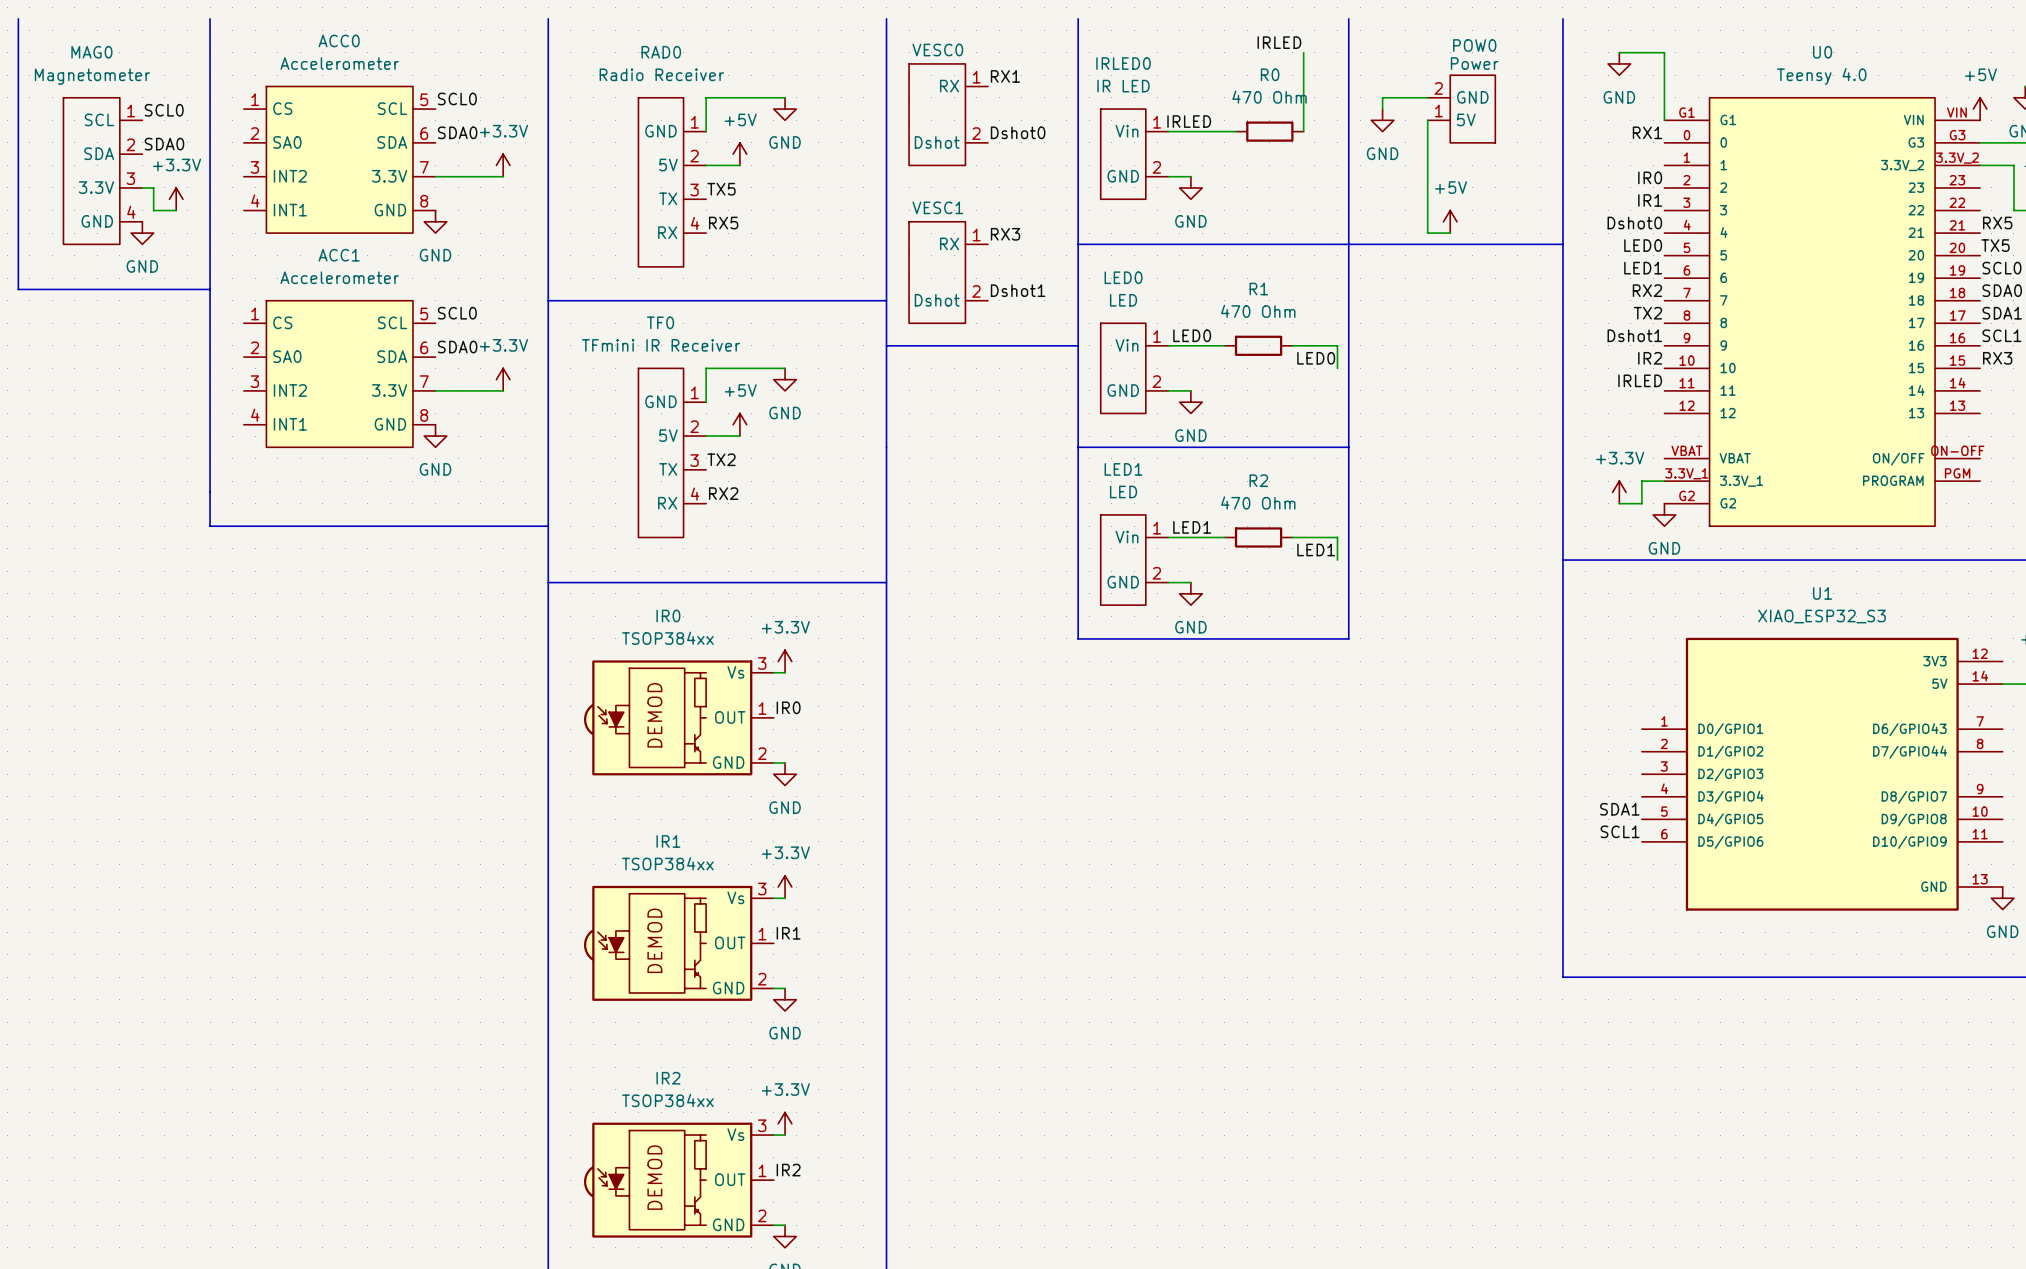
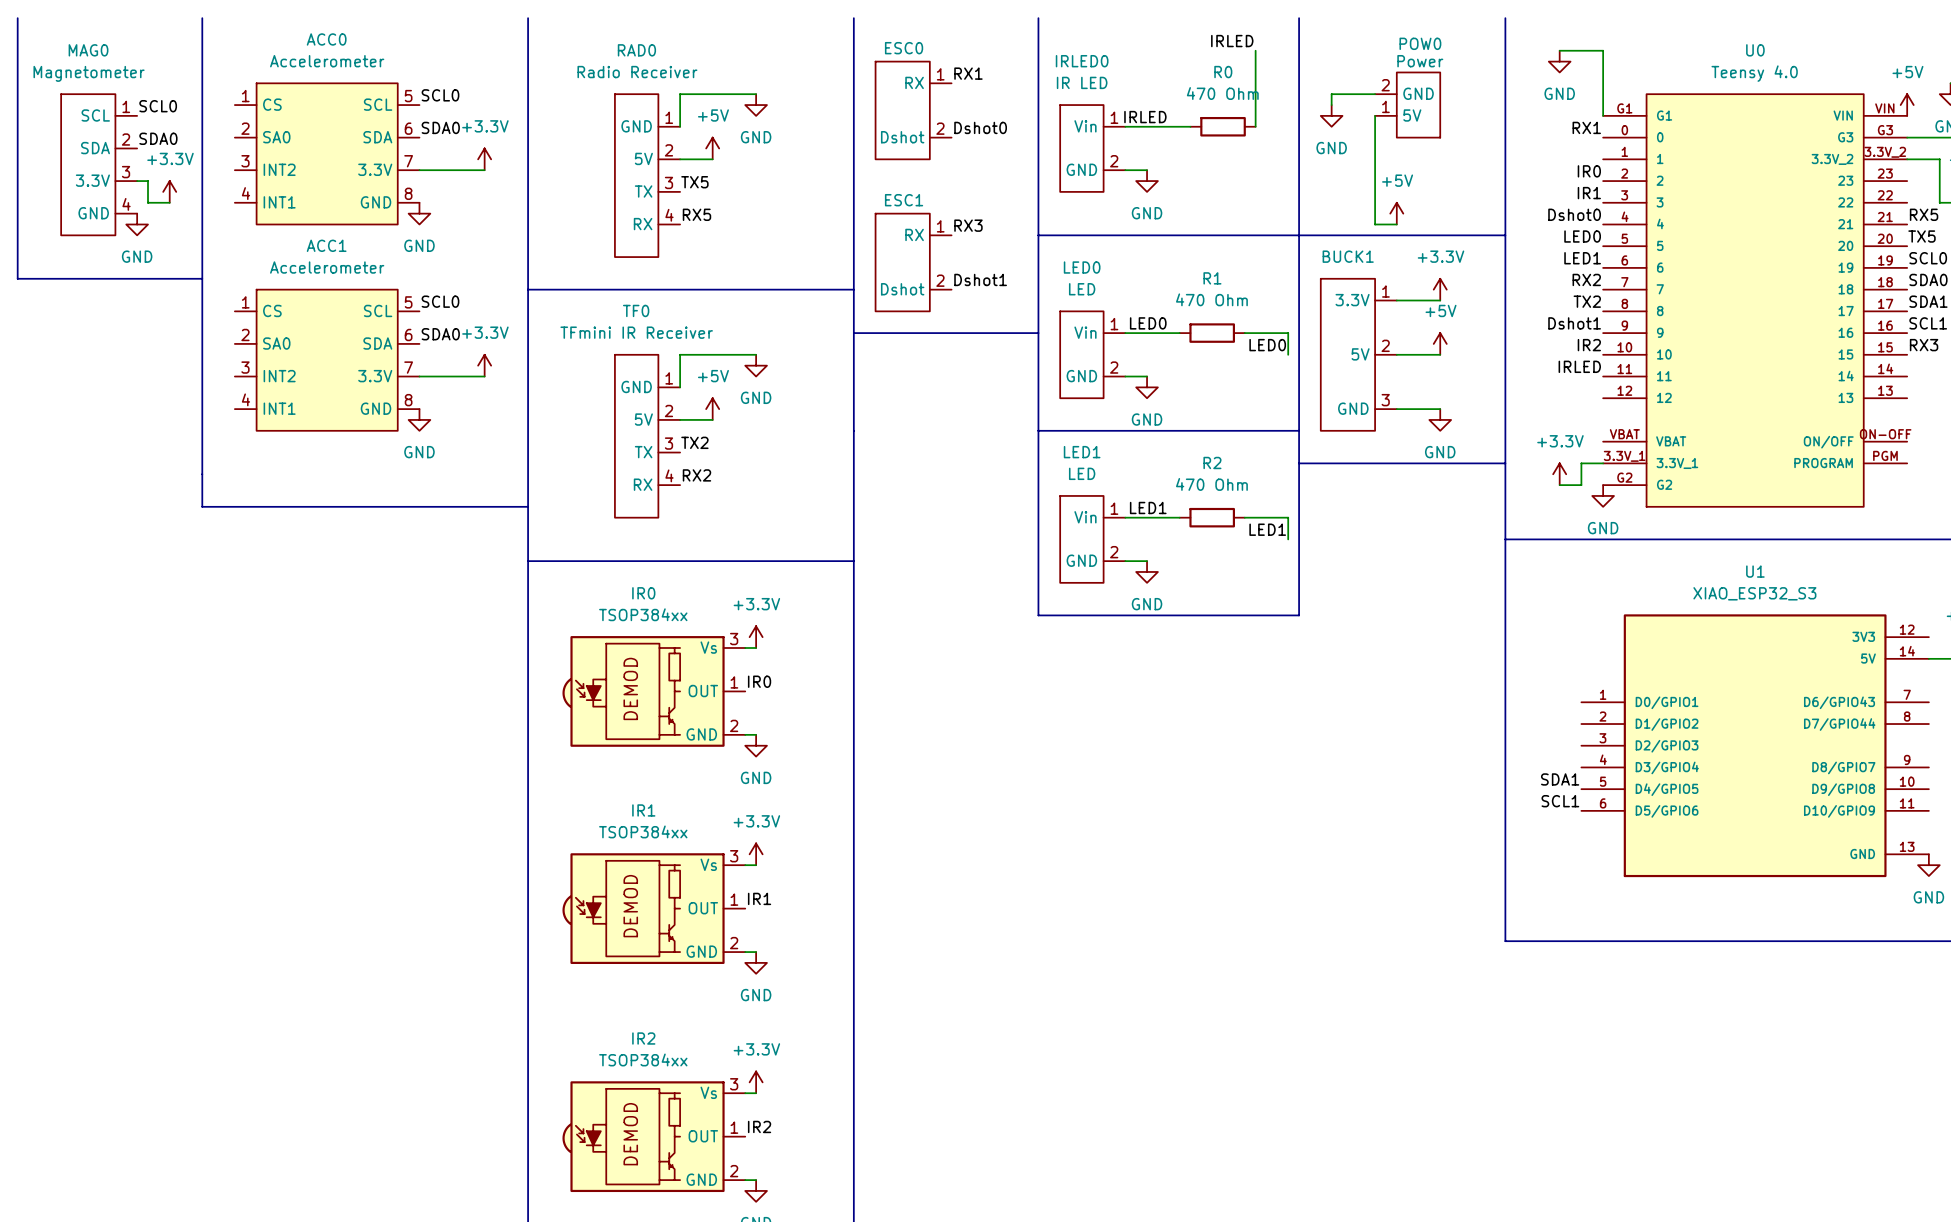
VESC0 name: VESC0 (937, 50) -> ESC0 (904, 48)
VESC1 name: VESC1 (937, 207) -> ESC1 (904, 200)
power symbol: none -> +3.3V (1440, 289)
wire: none -> (1396, 300) (1440, 300)
power symbol: none -> +5V (1440, 343)
BUCK1: none -> (1358, 354)
wire: none -> (1396, 354) (1440, 354)
wire: none -> (1396, 409) (1440, 409)
power symbol: none -> GND (1440, 419)
line: none -> (1299, 463) (1505, 463)

